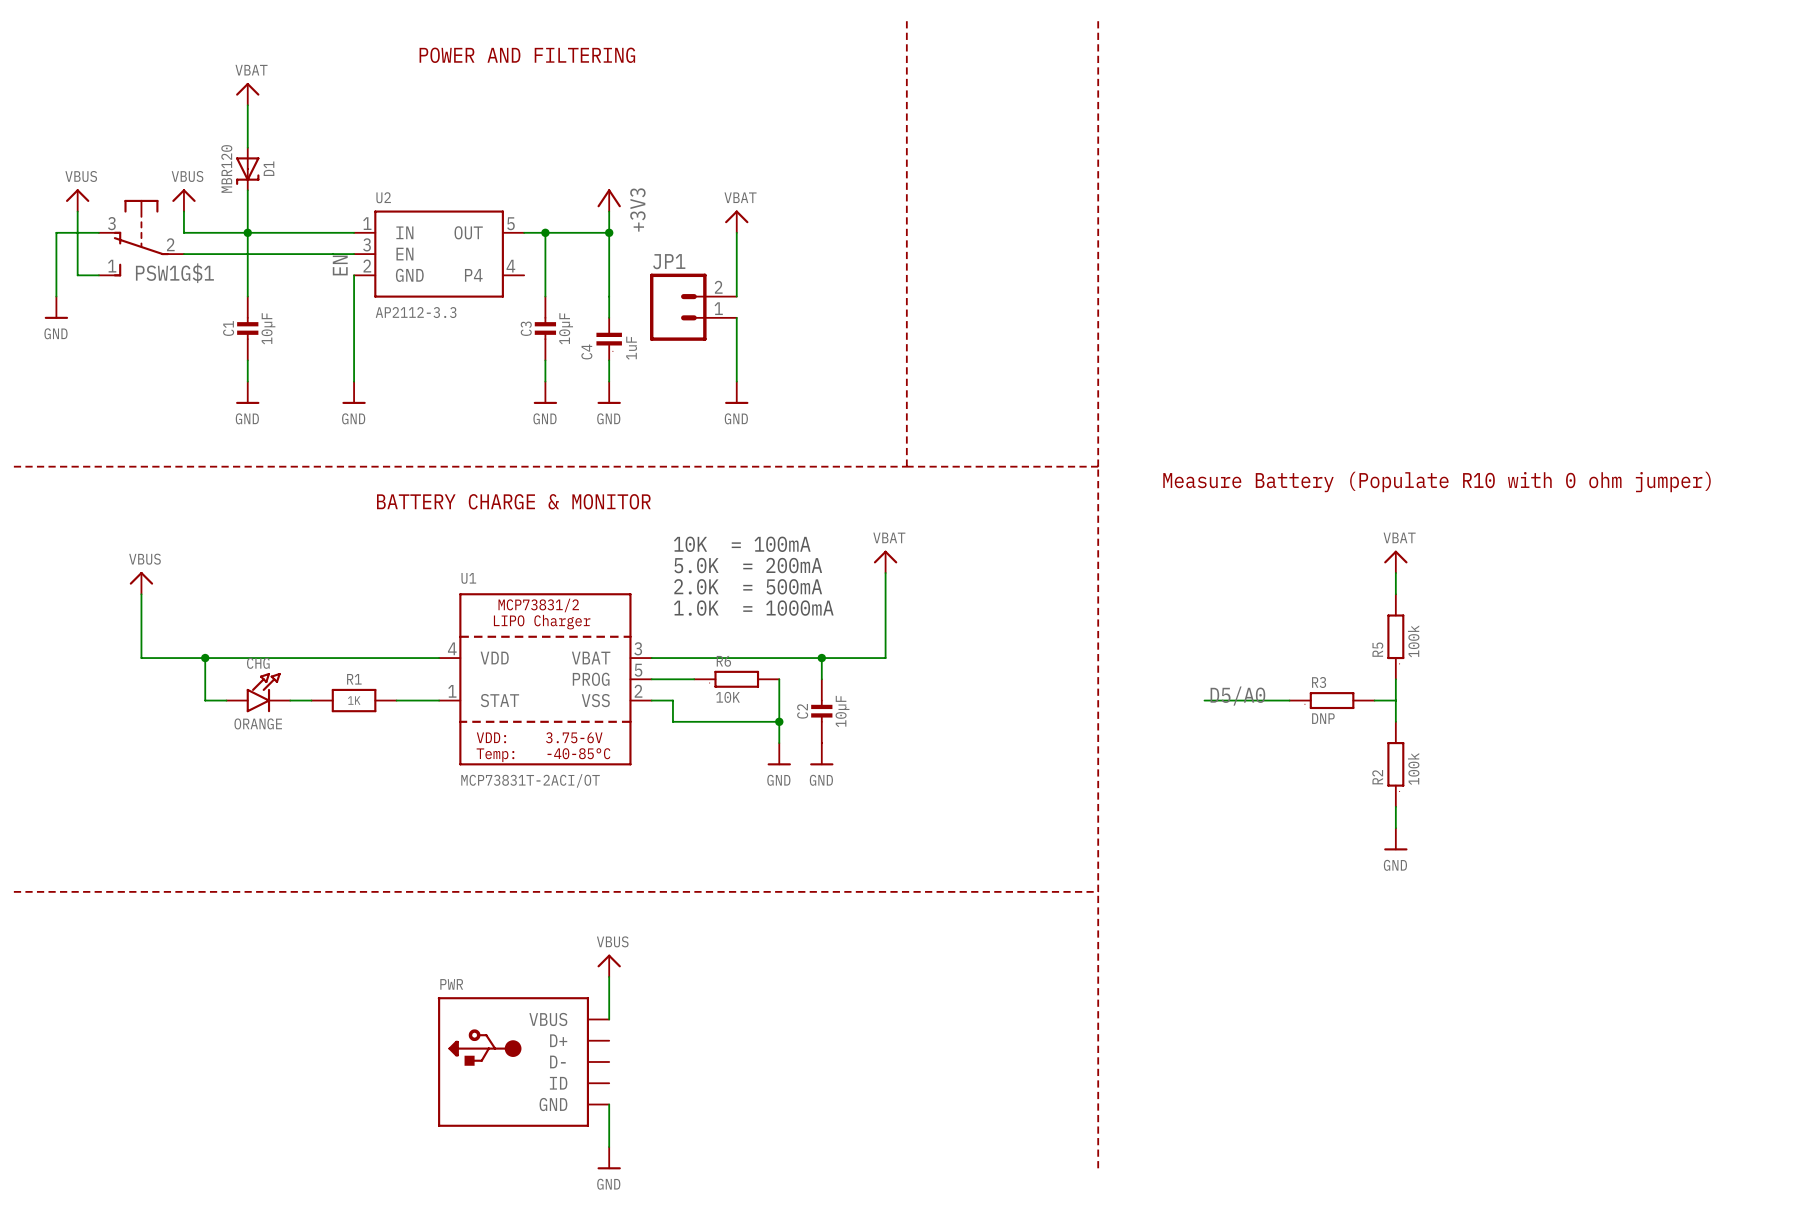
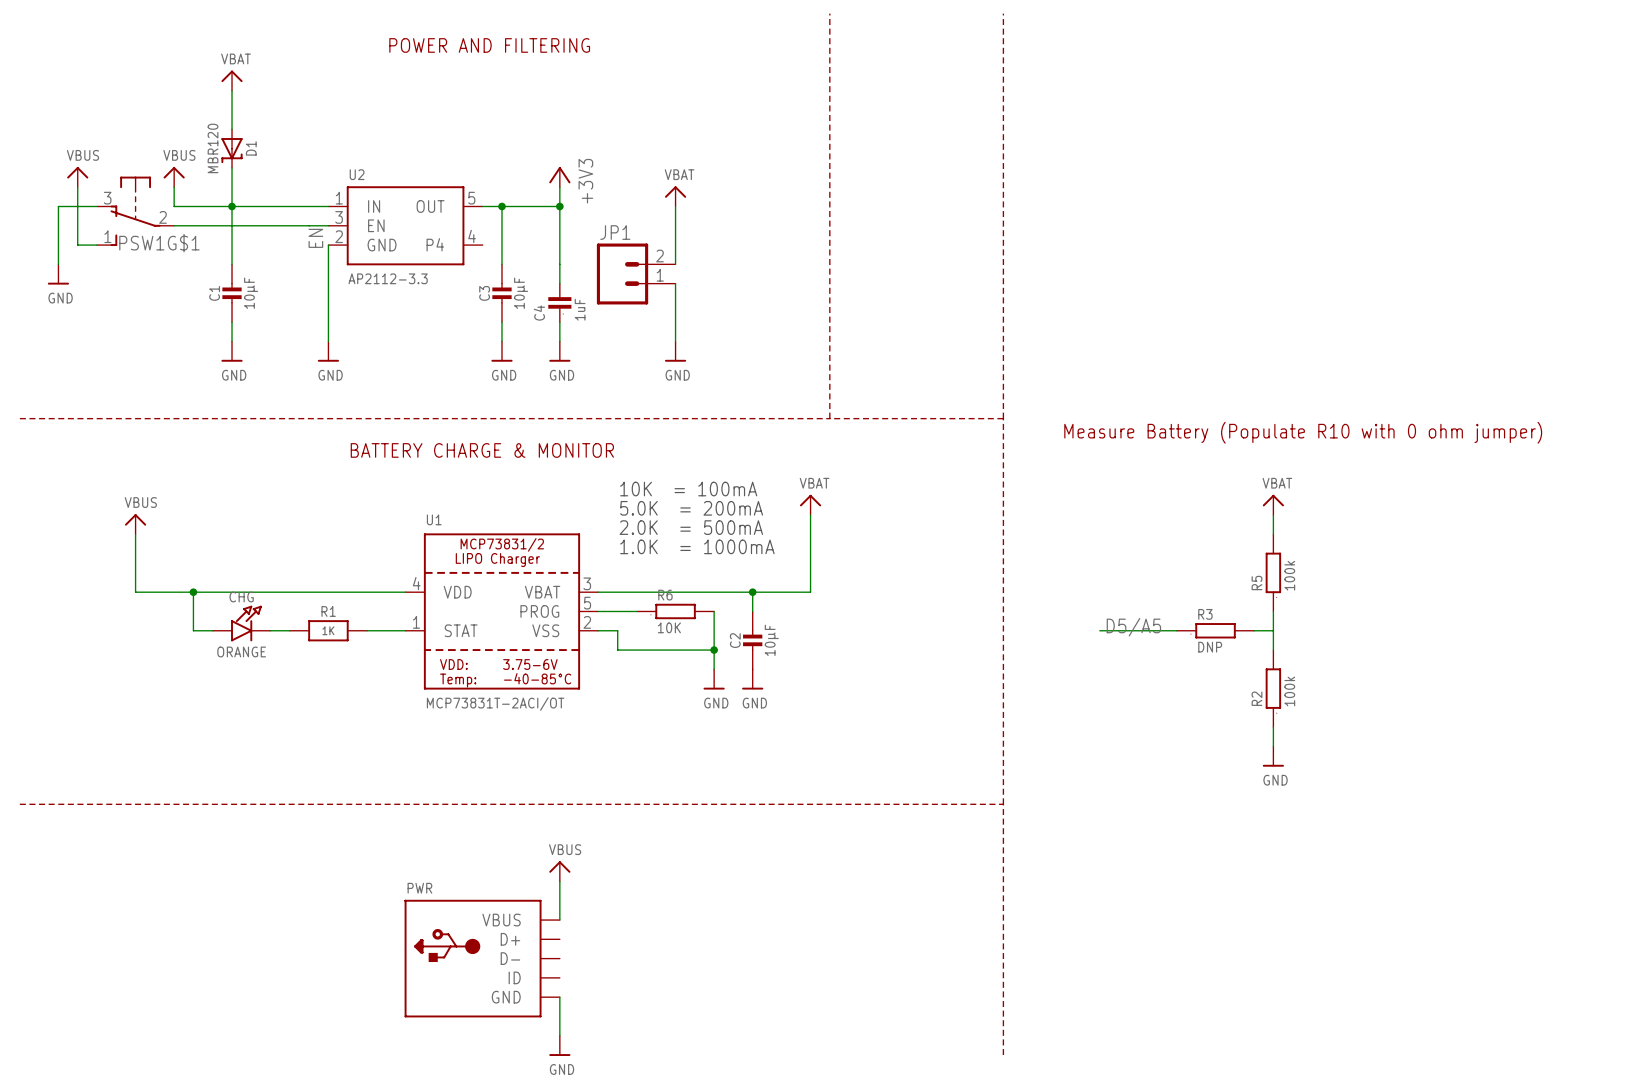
label: D5/A0 (1237, 696) -> D5/A5 (1133, 627)

